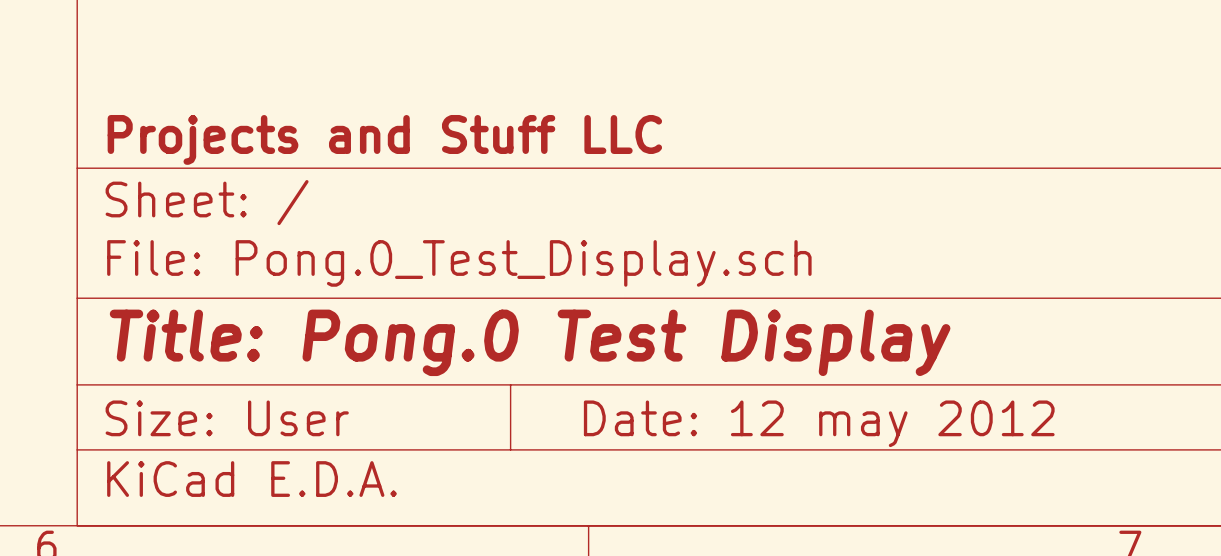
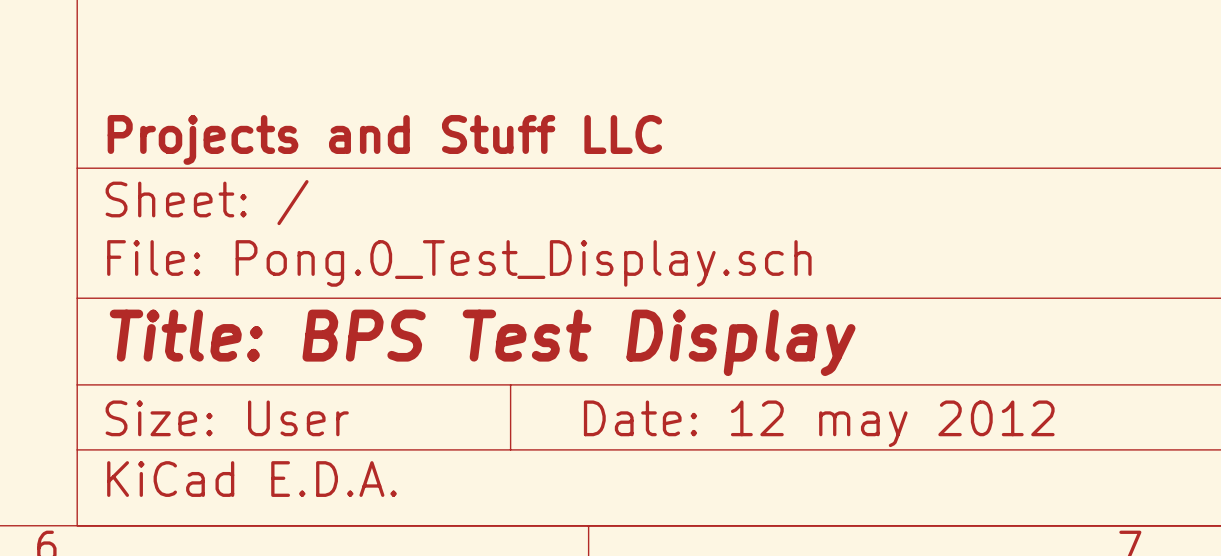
title block: Title: Pong.0 Test Display (530, 342) -> Title: BPS Test Display (482, 342)

